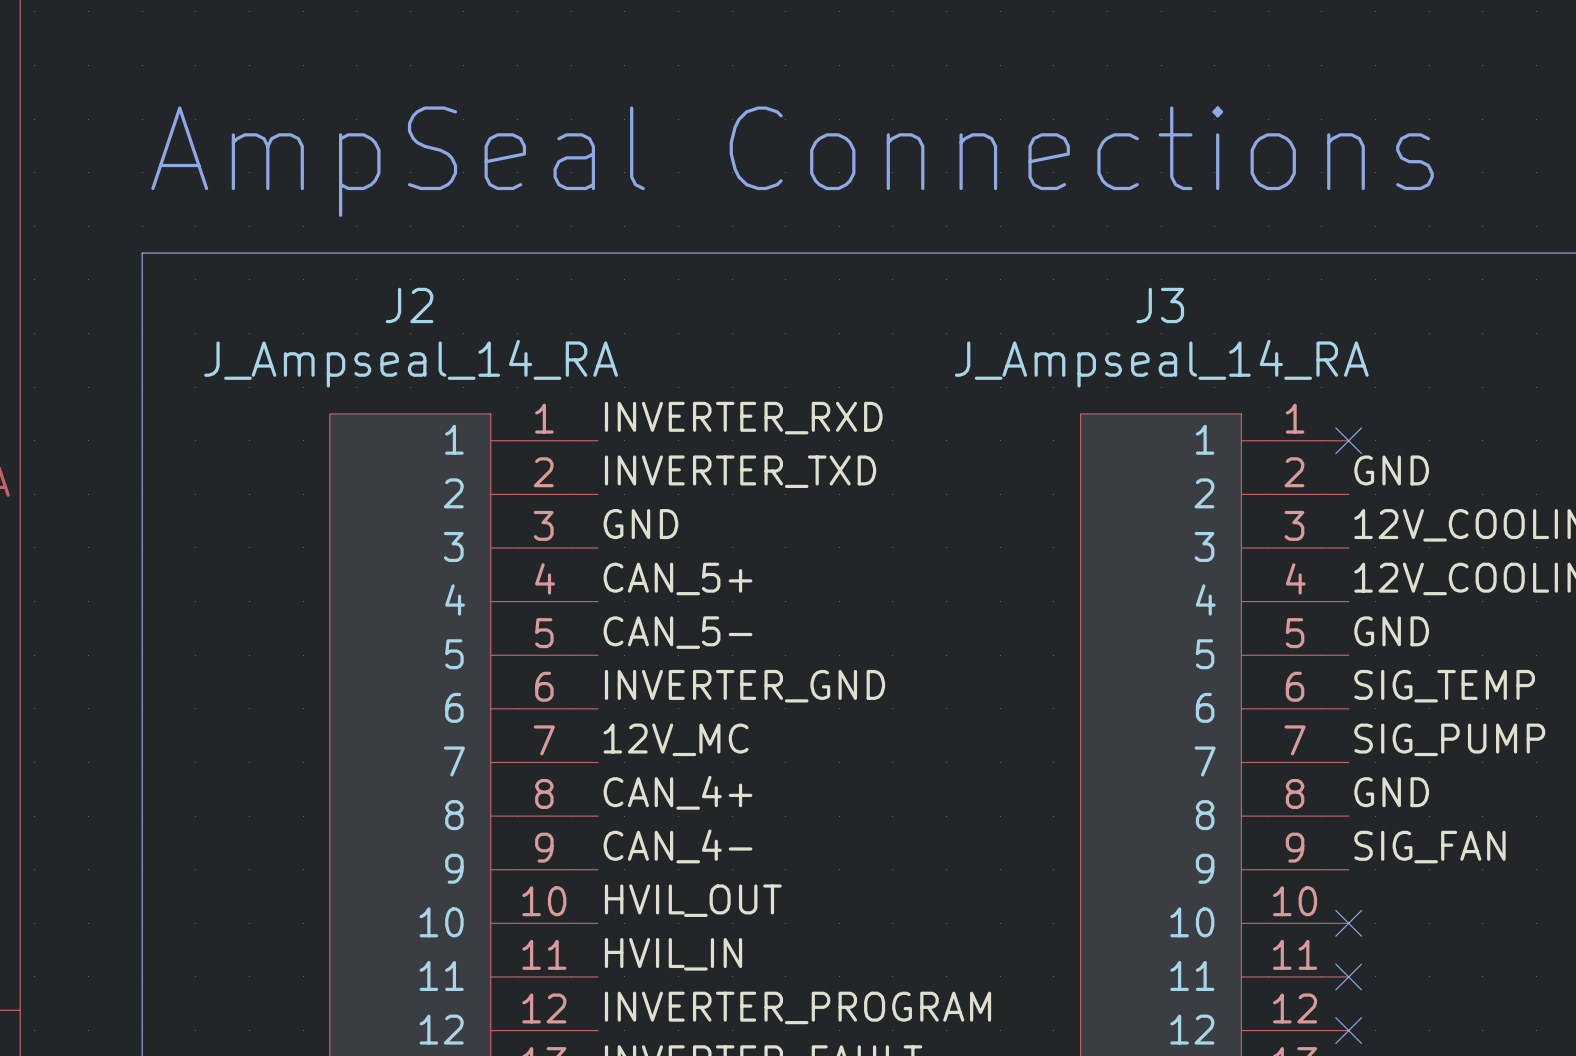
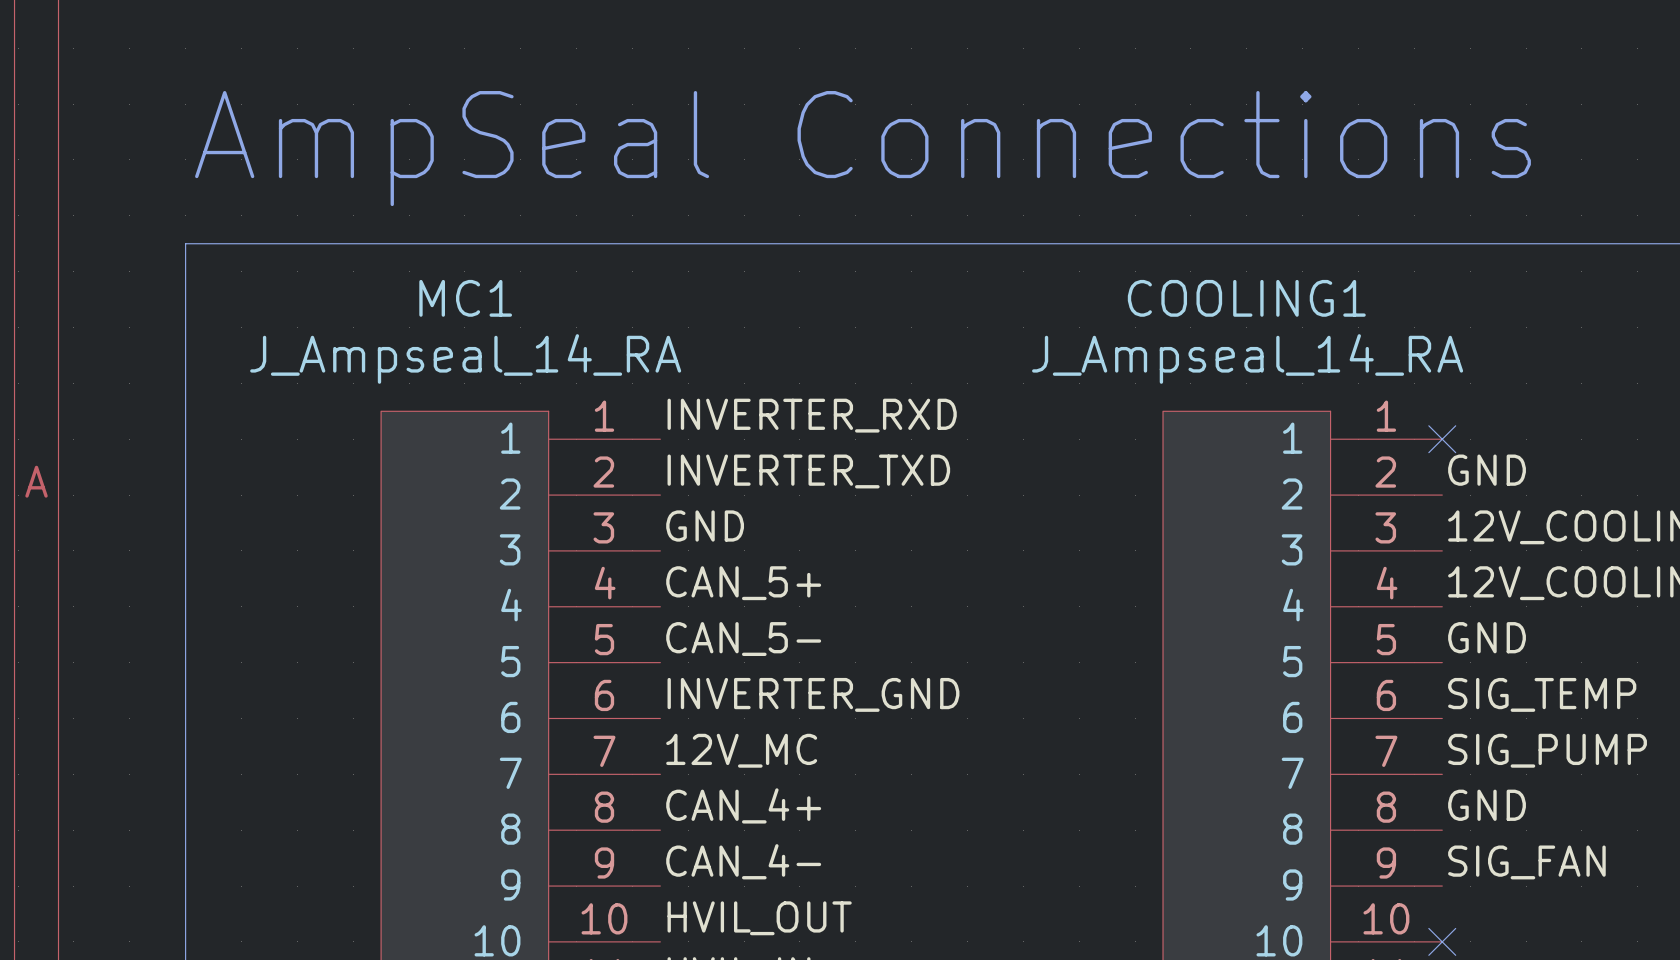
J2 name: J2 (409, 305) -> MC1 (465, 298)
J3 name: J3 (1160, 305) -> COOLING1 (1246, 298)

